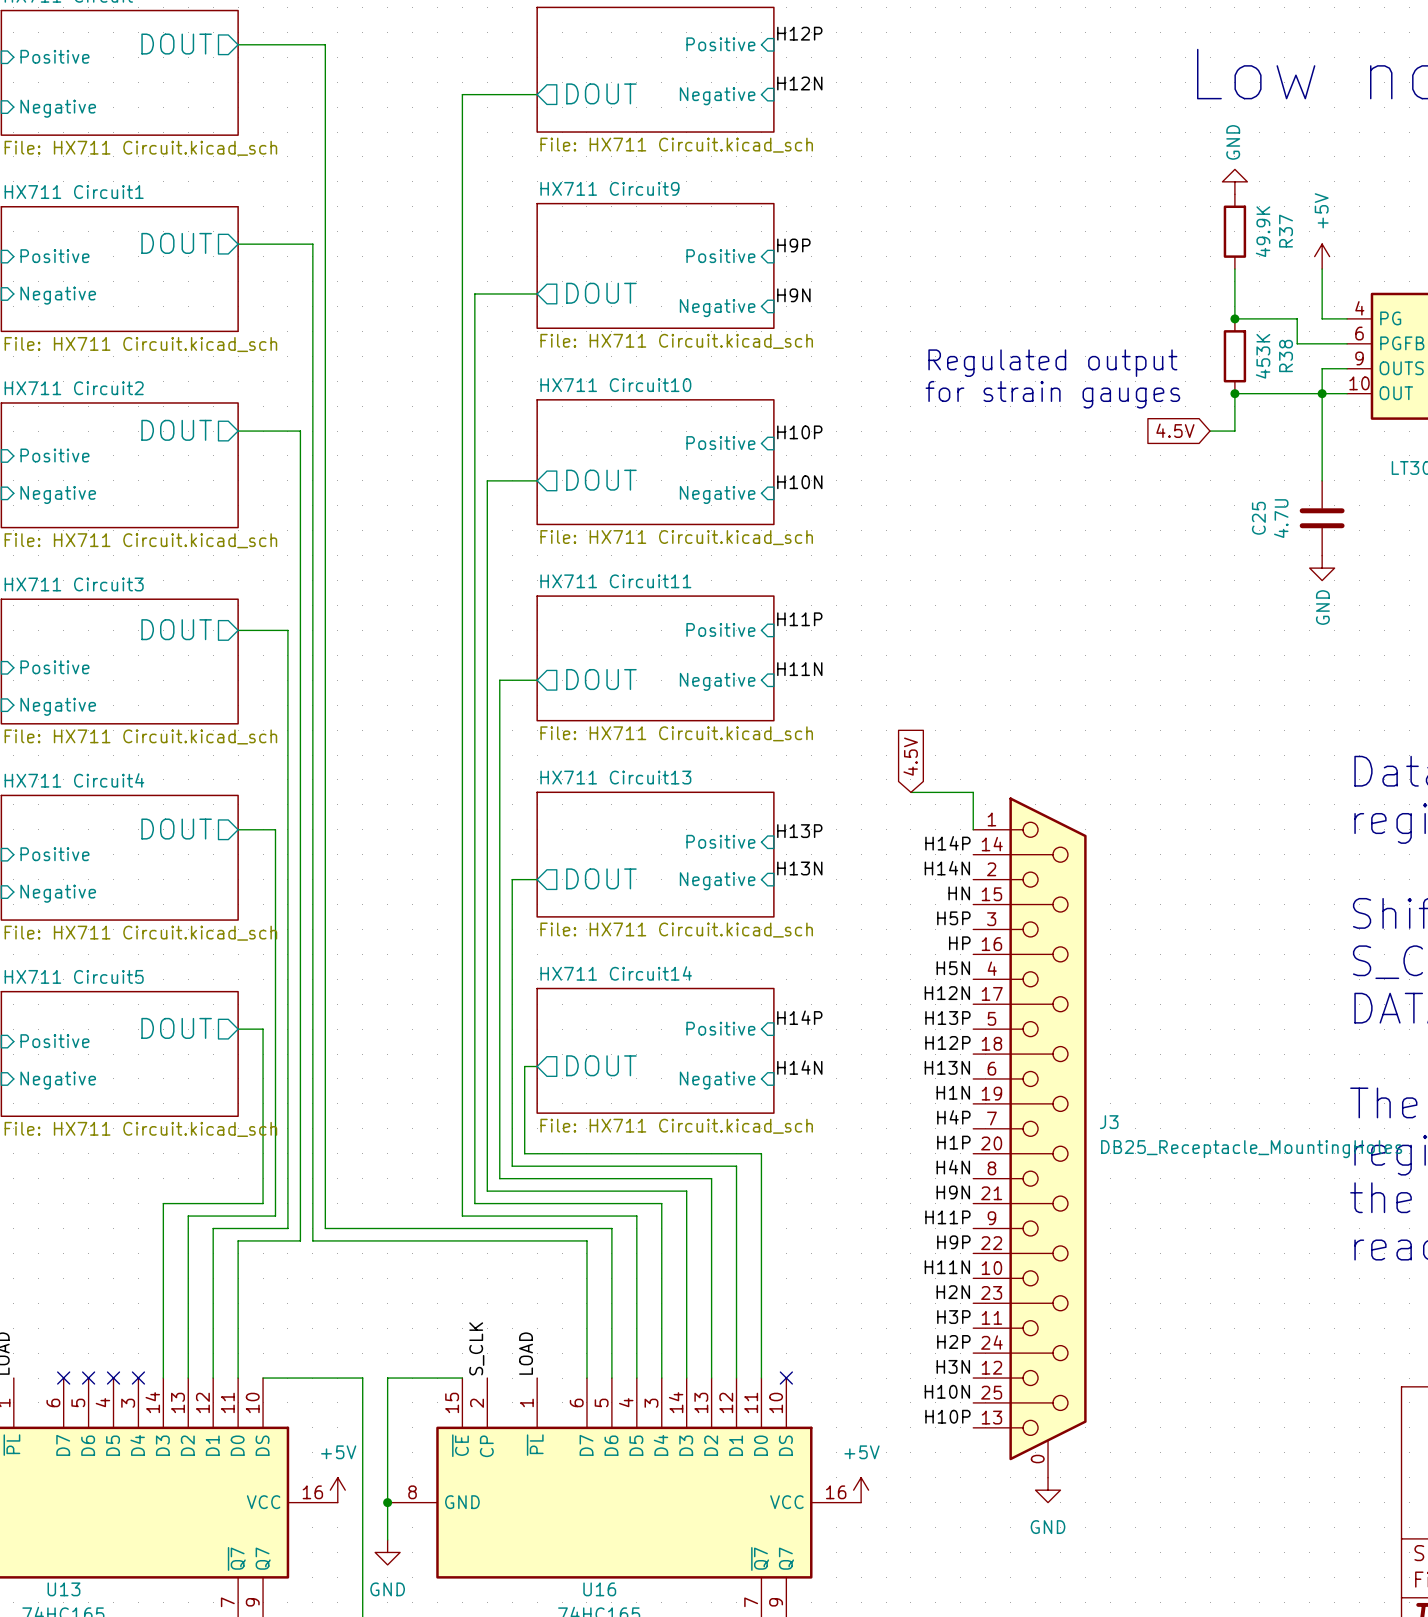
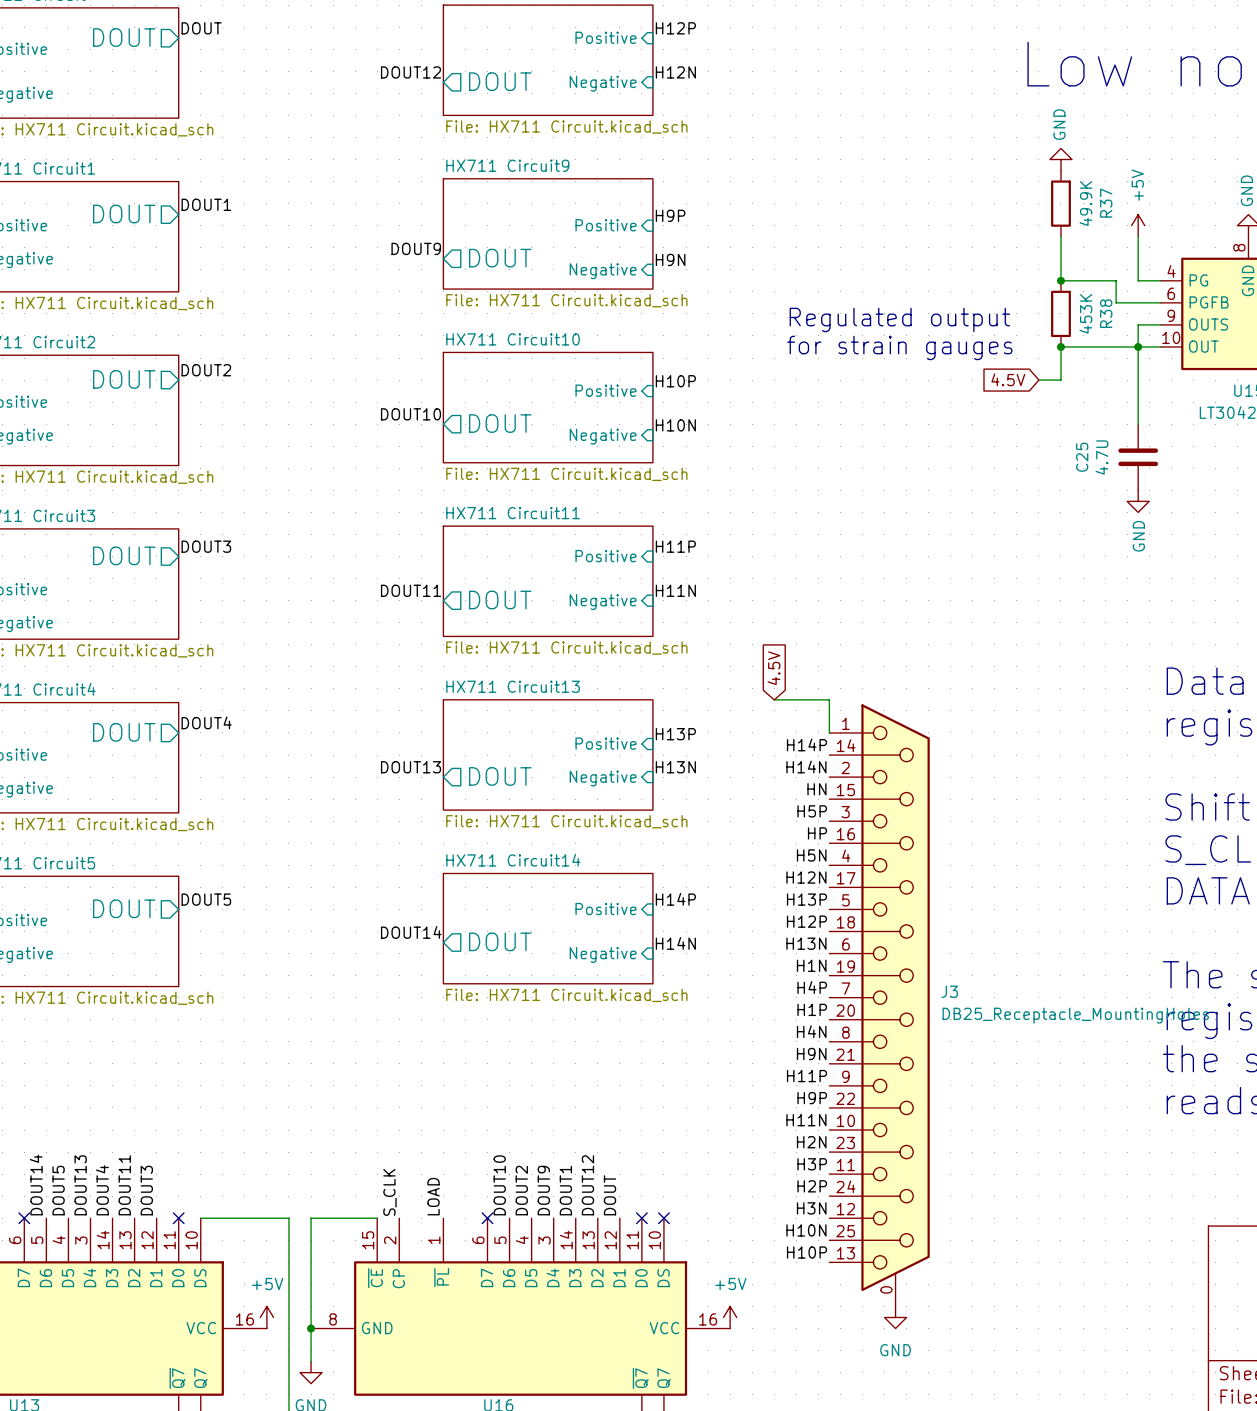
label: none -> DOUT (201, 28)
wire: (238, 44) (325, 44) (325, 1228) (611, 1228) (611, 1378) -> none
label: none -> DOUT12 (411, 72)
wire: (537, 94) (462, 94) (462, 1216) (636, 1216) (636, 1378) -> none
label: none -> DOUT1 (206, 204)
wire: (238, 244) (312, 244) (312, 1240) (586, 1240) (586, 1378) -> none
label: none -> DOUT9 (416, 248)
wire: (537, 293) (474, 293) (474, 1203) (661, 1203) (661, 1378) -> none
label: none -> DOUT2 (206, 370)
wire: (238, 431) (300, 431) (300, 1240) (238, 1240) (238, 1378) -> none
label: none -> DOUT10 (411, 414)
wire: (537, 480) (487, 480) (487, 1191) (686, 1191) (686, 1378) -> none
label: none -> DOUT3 (206, 546)
wire: (238, 630) (287, 630) (287, 1228) (213, 1228) (213, 1378) -> none
label: none -> DOUT11 (411, 590)
wire: (537, 680) (499, 680) (499, 1178) (711, 1178) (711, 1378) -> none
label: none -> DOUT4 (206, 722)
wire: (238, 829) (275, 829) (275, 1216) (188, 1216) (188, 1378) -> none
label: none -> DOUT13 (411, 767)
wire: (537, 879) (512, 879) (512, 1166) (736, 1166) (736, 1378) -> none
label: none -> DOUT5 (206, 899)
wire: (238, 1029) (263, 1029) (263, 1203) (163, 1203) (163, 1378) -> none
label: none -> DOUT14 (411, 932)
wire: (537, 1066) (524, 1066) (524, 1153) (761, 1153) (761, 1378) -> none
label: none -> DOUT14 (36, 1185)
label: none -> DOUT13 (80, 1185)
label: none -> DOUT11 (124, 1185)
label: none -> DOUT10 (499, 1185)
label: none -> DOUT12 (587, 1185)
label: none -> DOUT5 (58, 1190)
label: none -> DOUT4 (102, 1190)
label: none -> DOUT3 (146, 1190)
label: none -> DOUT2 (521, 1190)
label: none -> DOUT9 (543, 1190)
label: none -> DOUT1 (565, 1190)
label: none -> DOUT (610, 1195)
no-connect mark: (88, 1378) -> none
no-connect mark: (113, 1378) -> none
no-connect mark: (138, 1378) -> none
no-connect mark: none -> (178, 1218)
no-connect mark: none -> (487, 1218)
no-connect mark: none -> (641, 1218)

